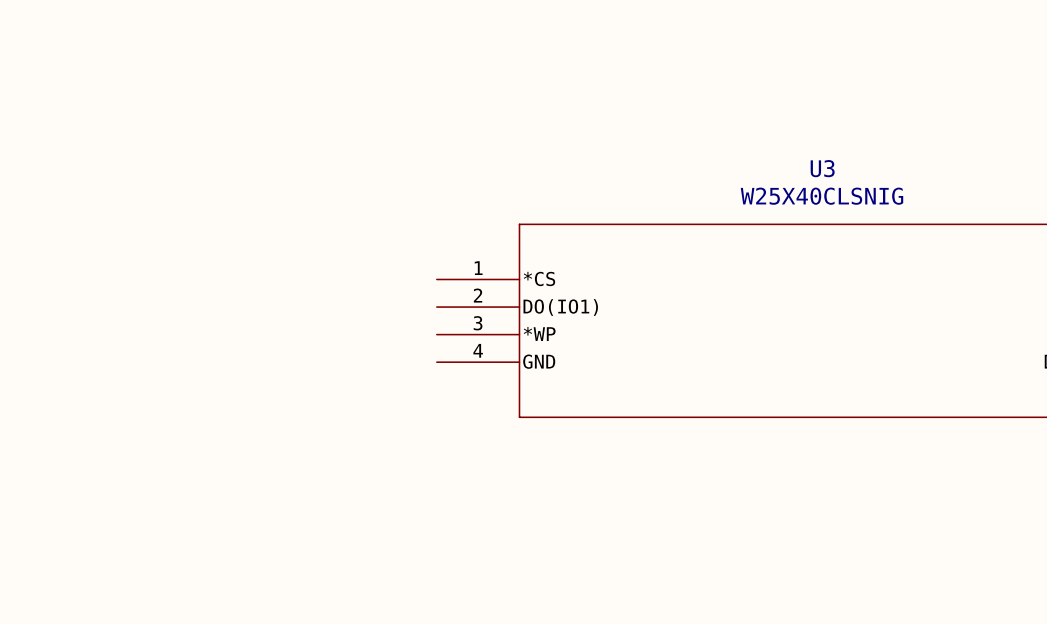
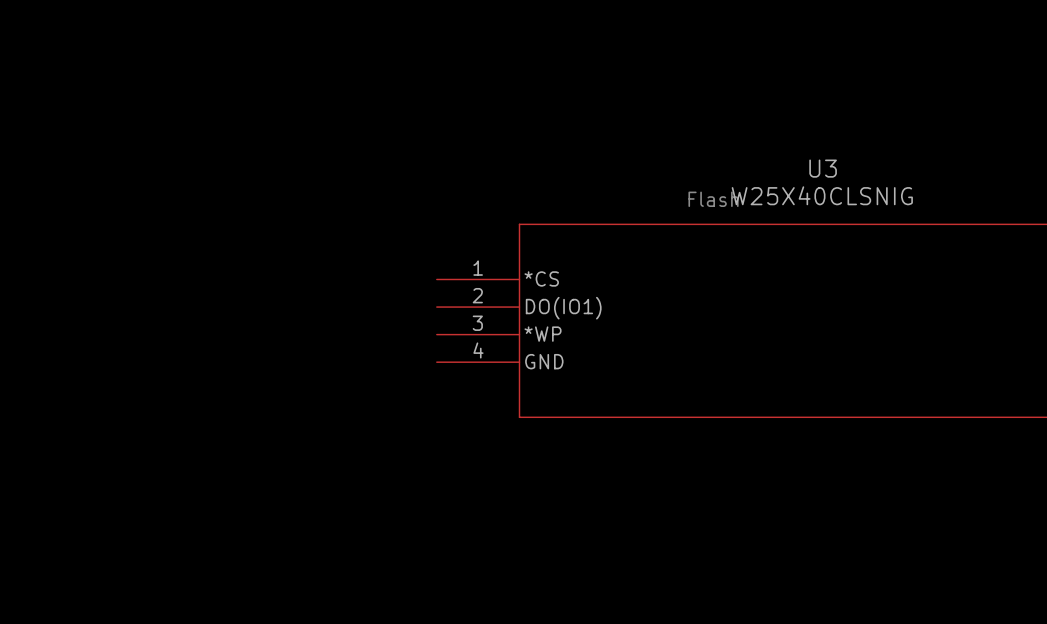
text: none -> Flash (713, 199)

